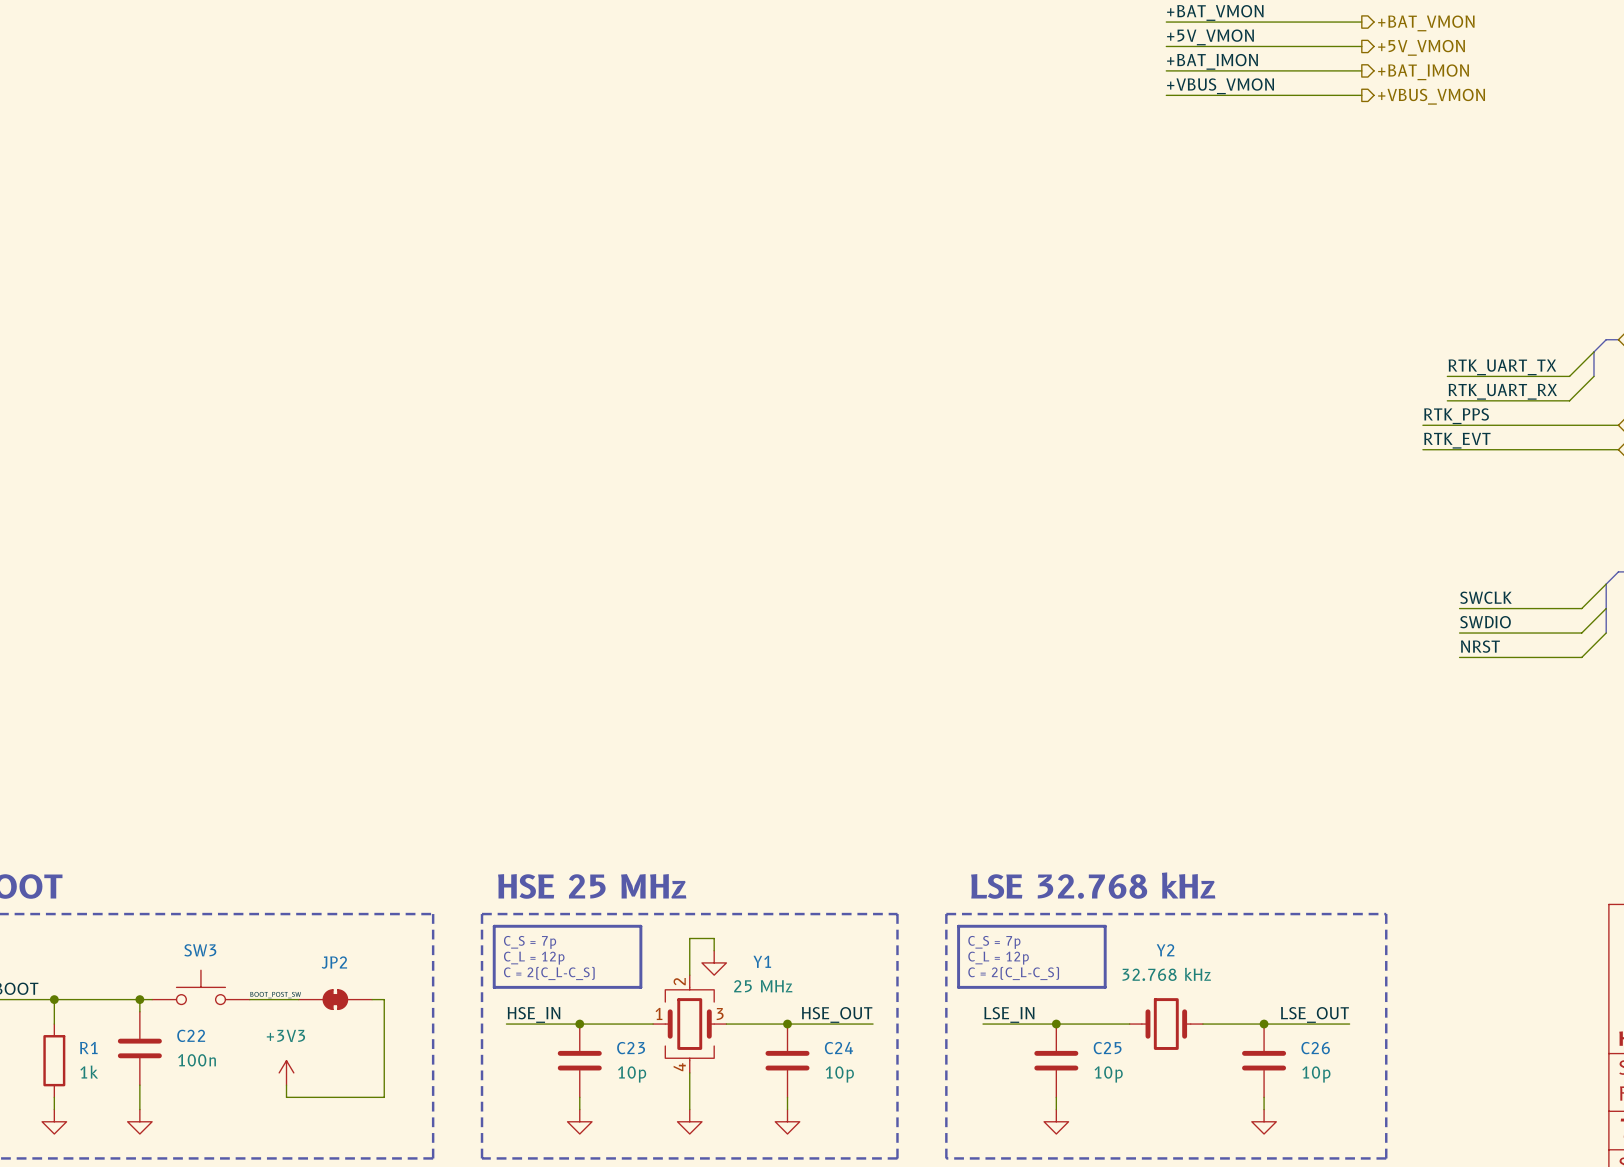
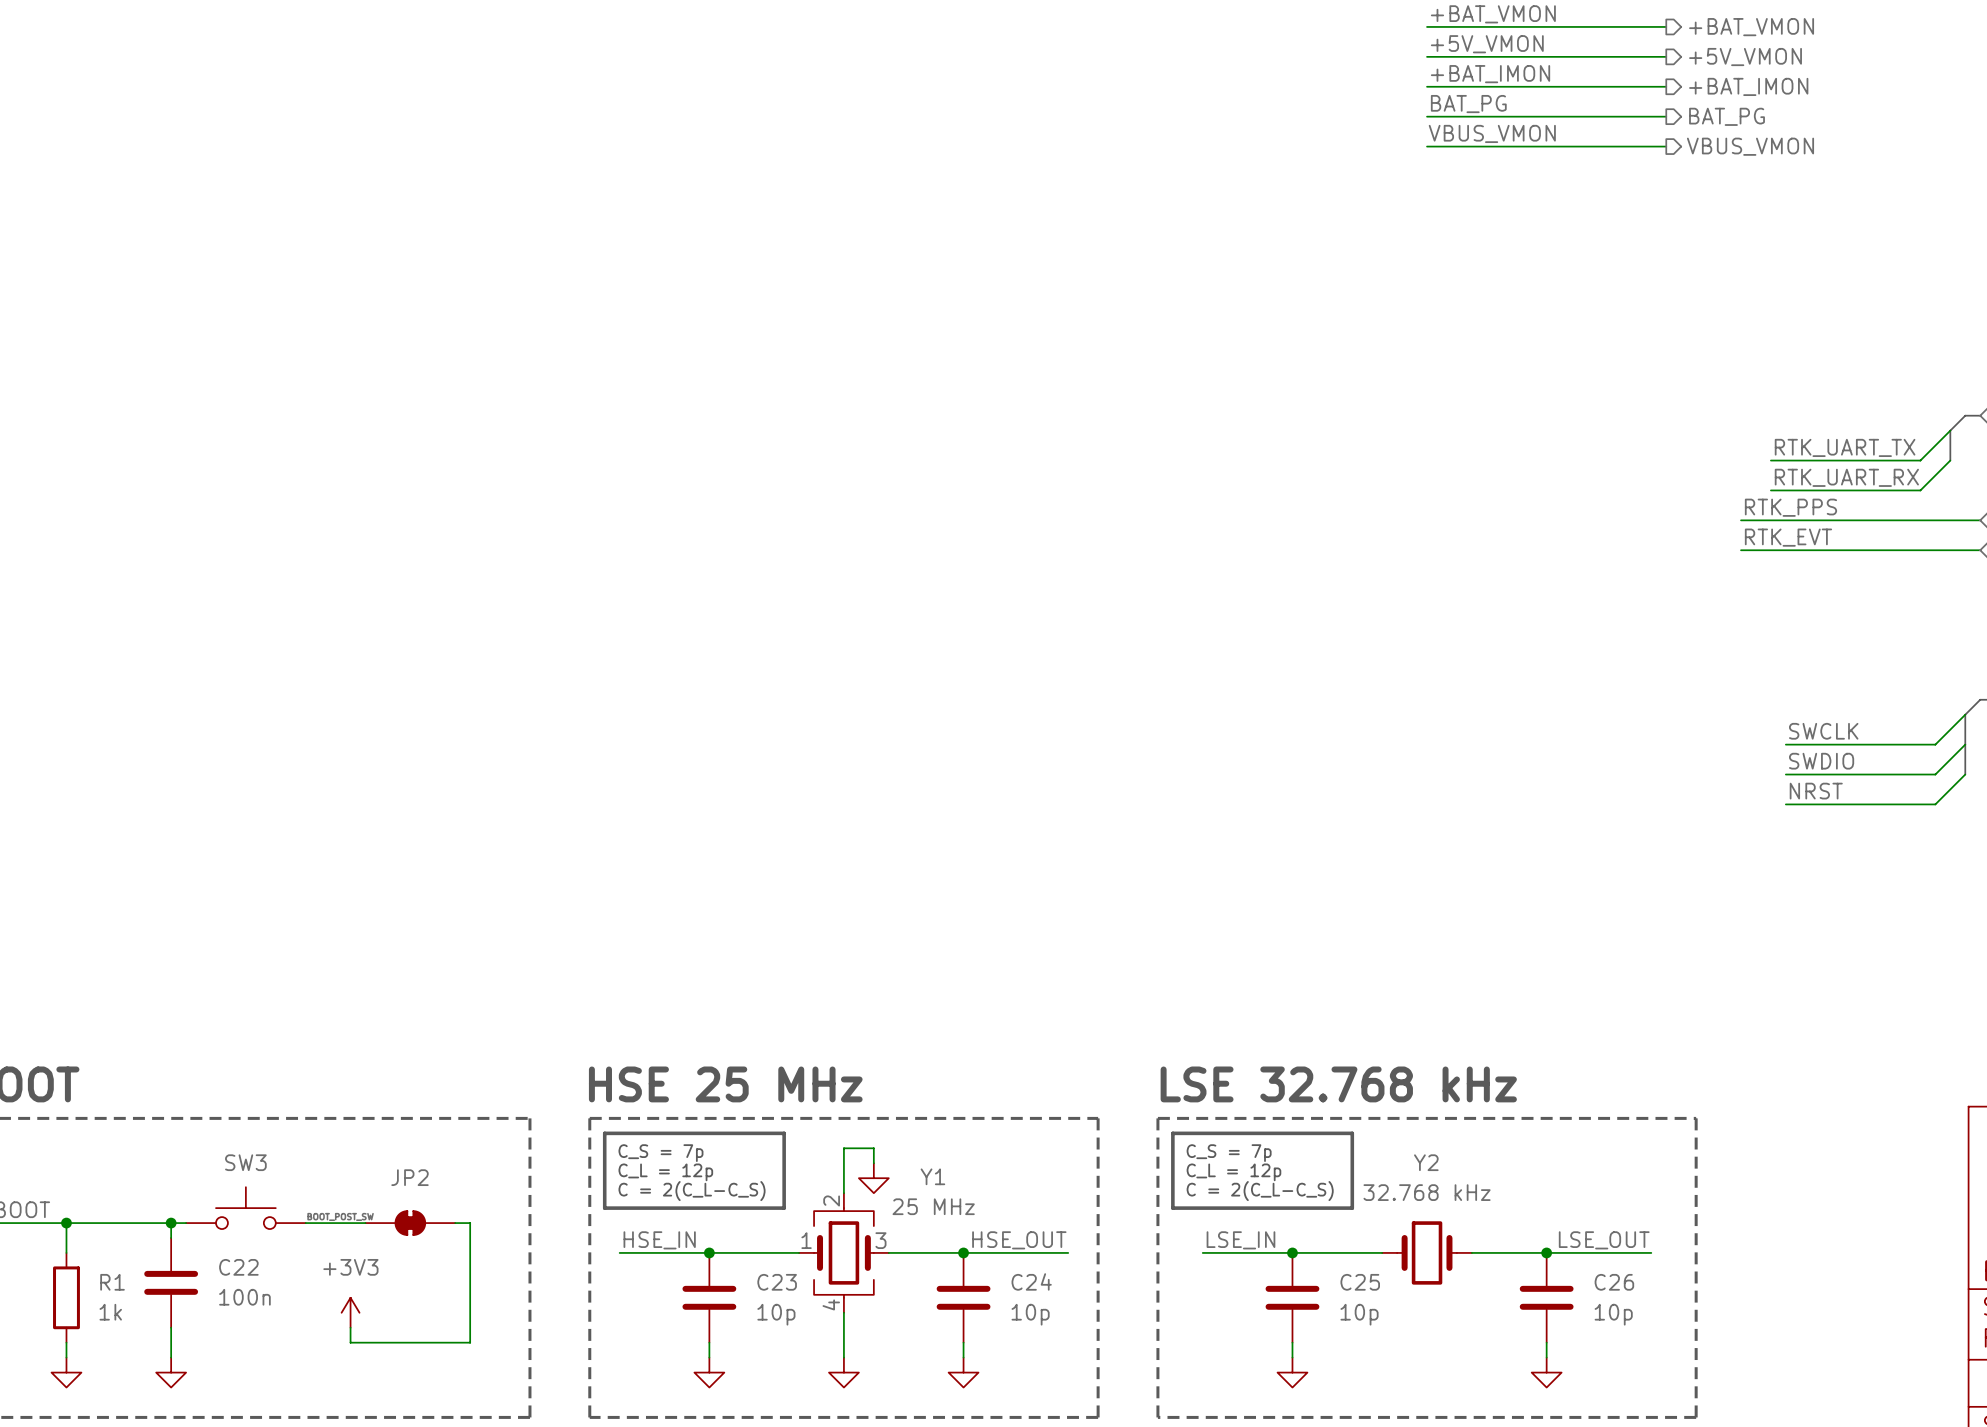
label: +VBUS_VMON (1220, 86) -> BAT_PG (1468, 104)
hierarchical label: +VBUS_VMON (1431, 96) -> BAT_PG (1727, 116)
label: none -> VBUS_VMON (1492, 133)
wire: none -> (1427, 146) (1666, 146)
hierarchical label: none -> VBUS_VMON (1750, 146)

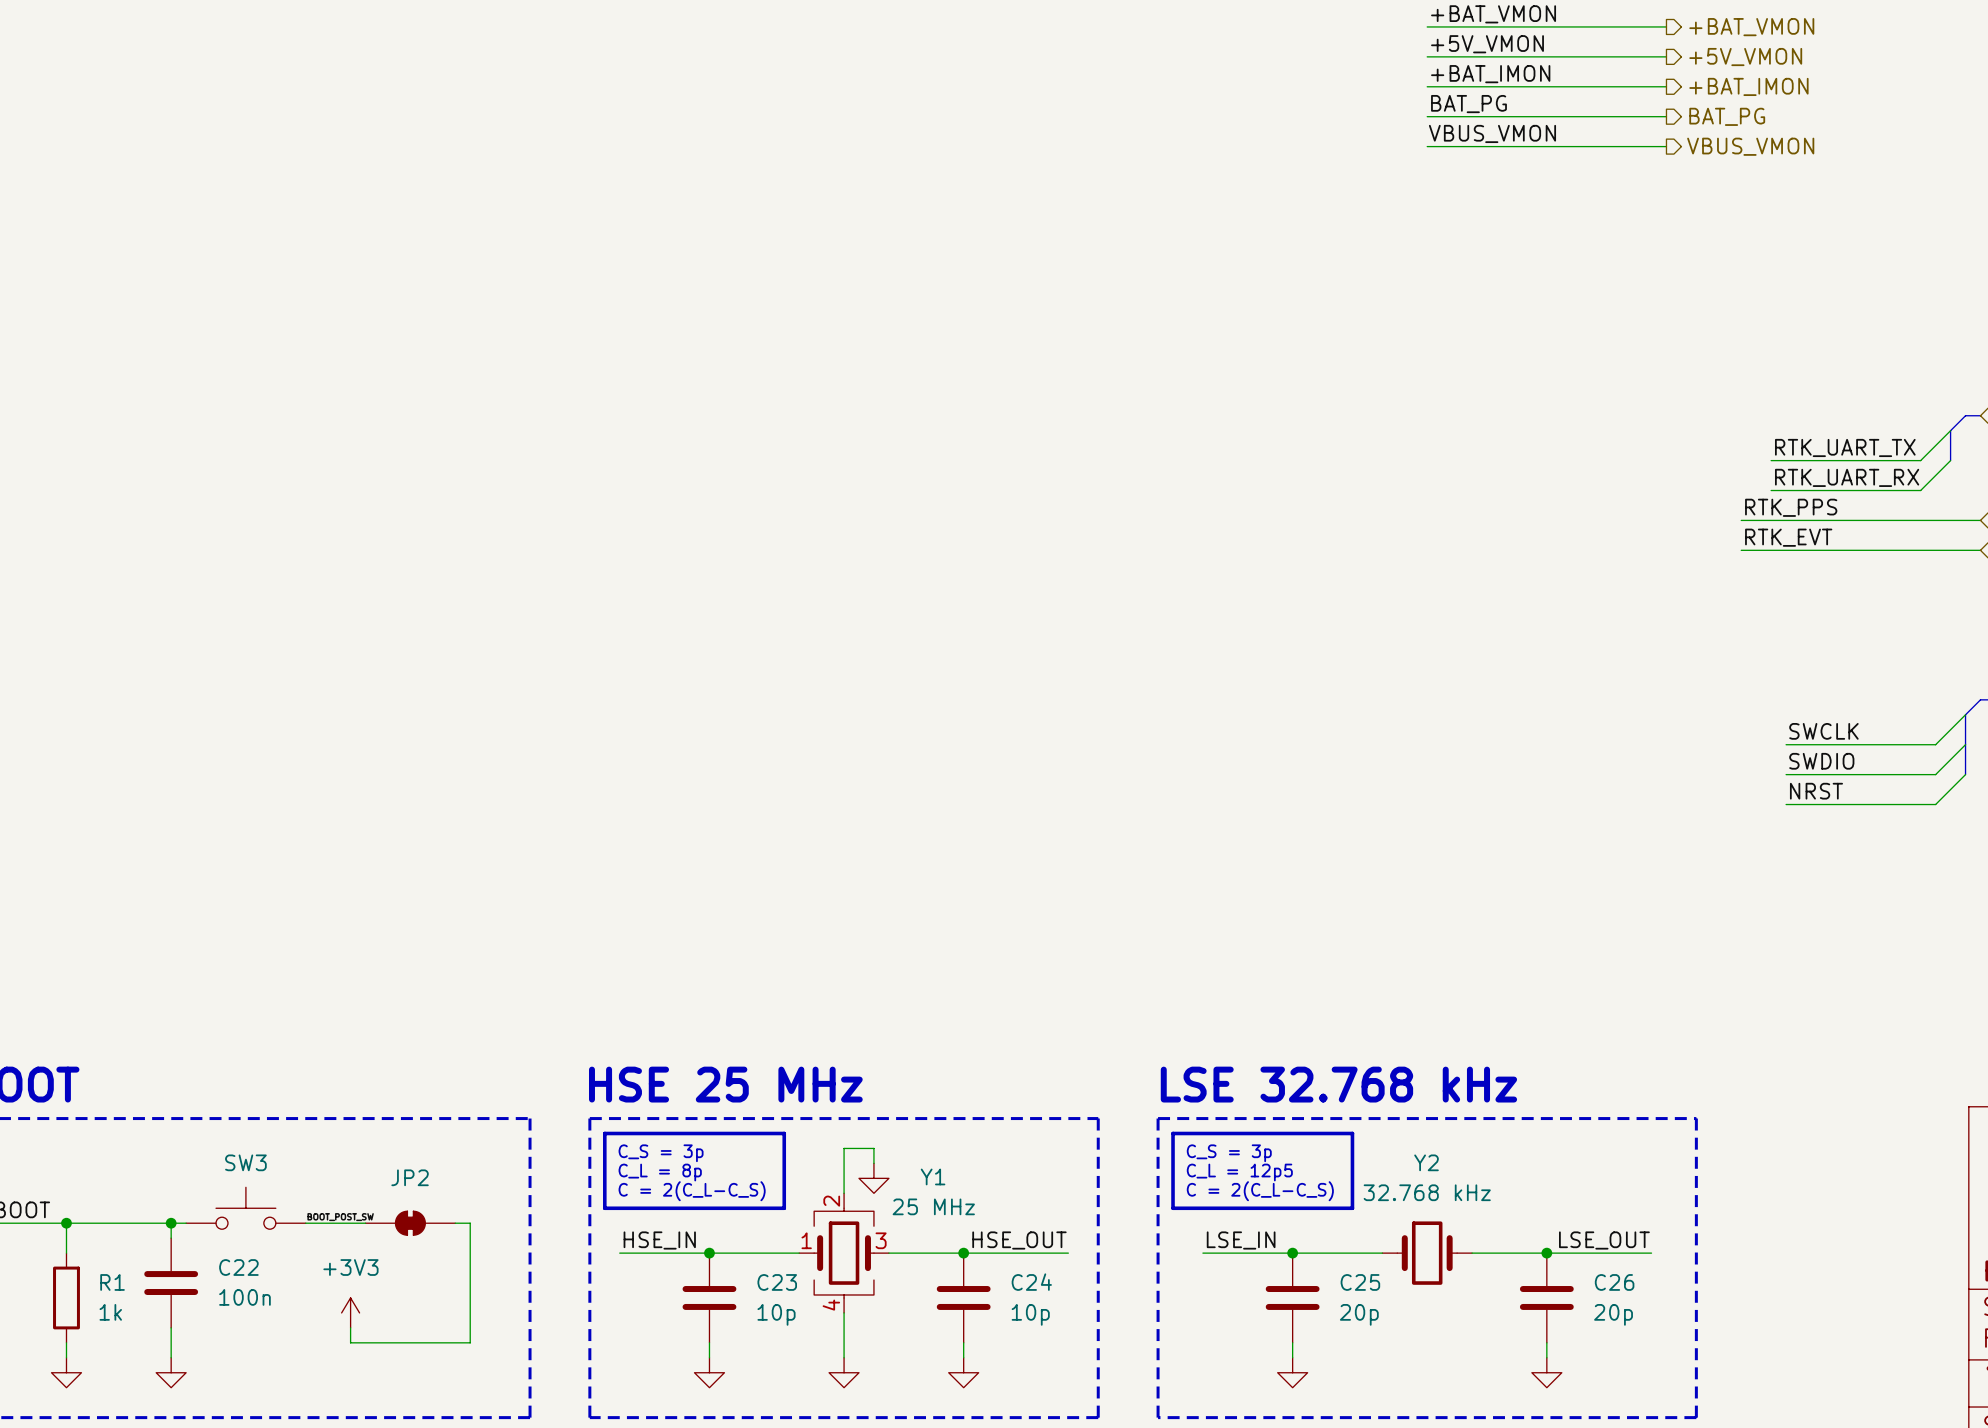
text: C_S = 7p (660, 1153) -> C_S = 3p (661, 1153)
text: C_S = 7p (1229, 1153) -> C_S = 3p (1229, 1153)
text: C_L = 12p (665, 1172) -> C_L = 8p (660, 1172)
text: C_L = 12p (1233, 1172) -> C_L = 12p5 (1239, 1172)
C25 value: 10p (1359, 1314) -> 20p (1359, 1314)
C26 value: 10p (1613, 1314) -> 20p (1613, 1314)

